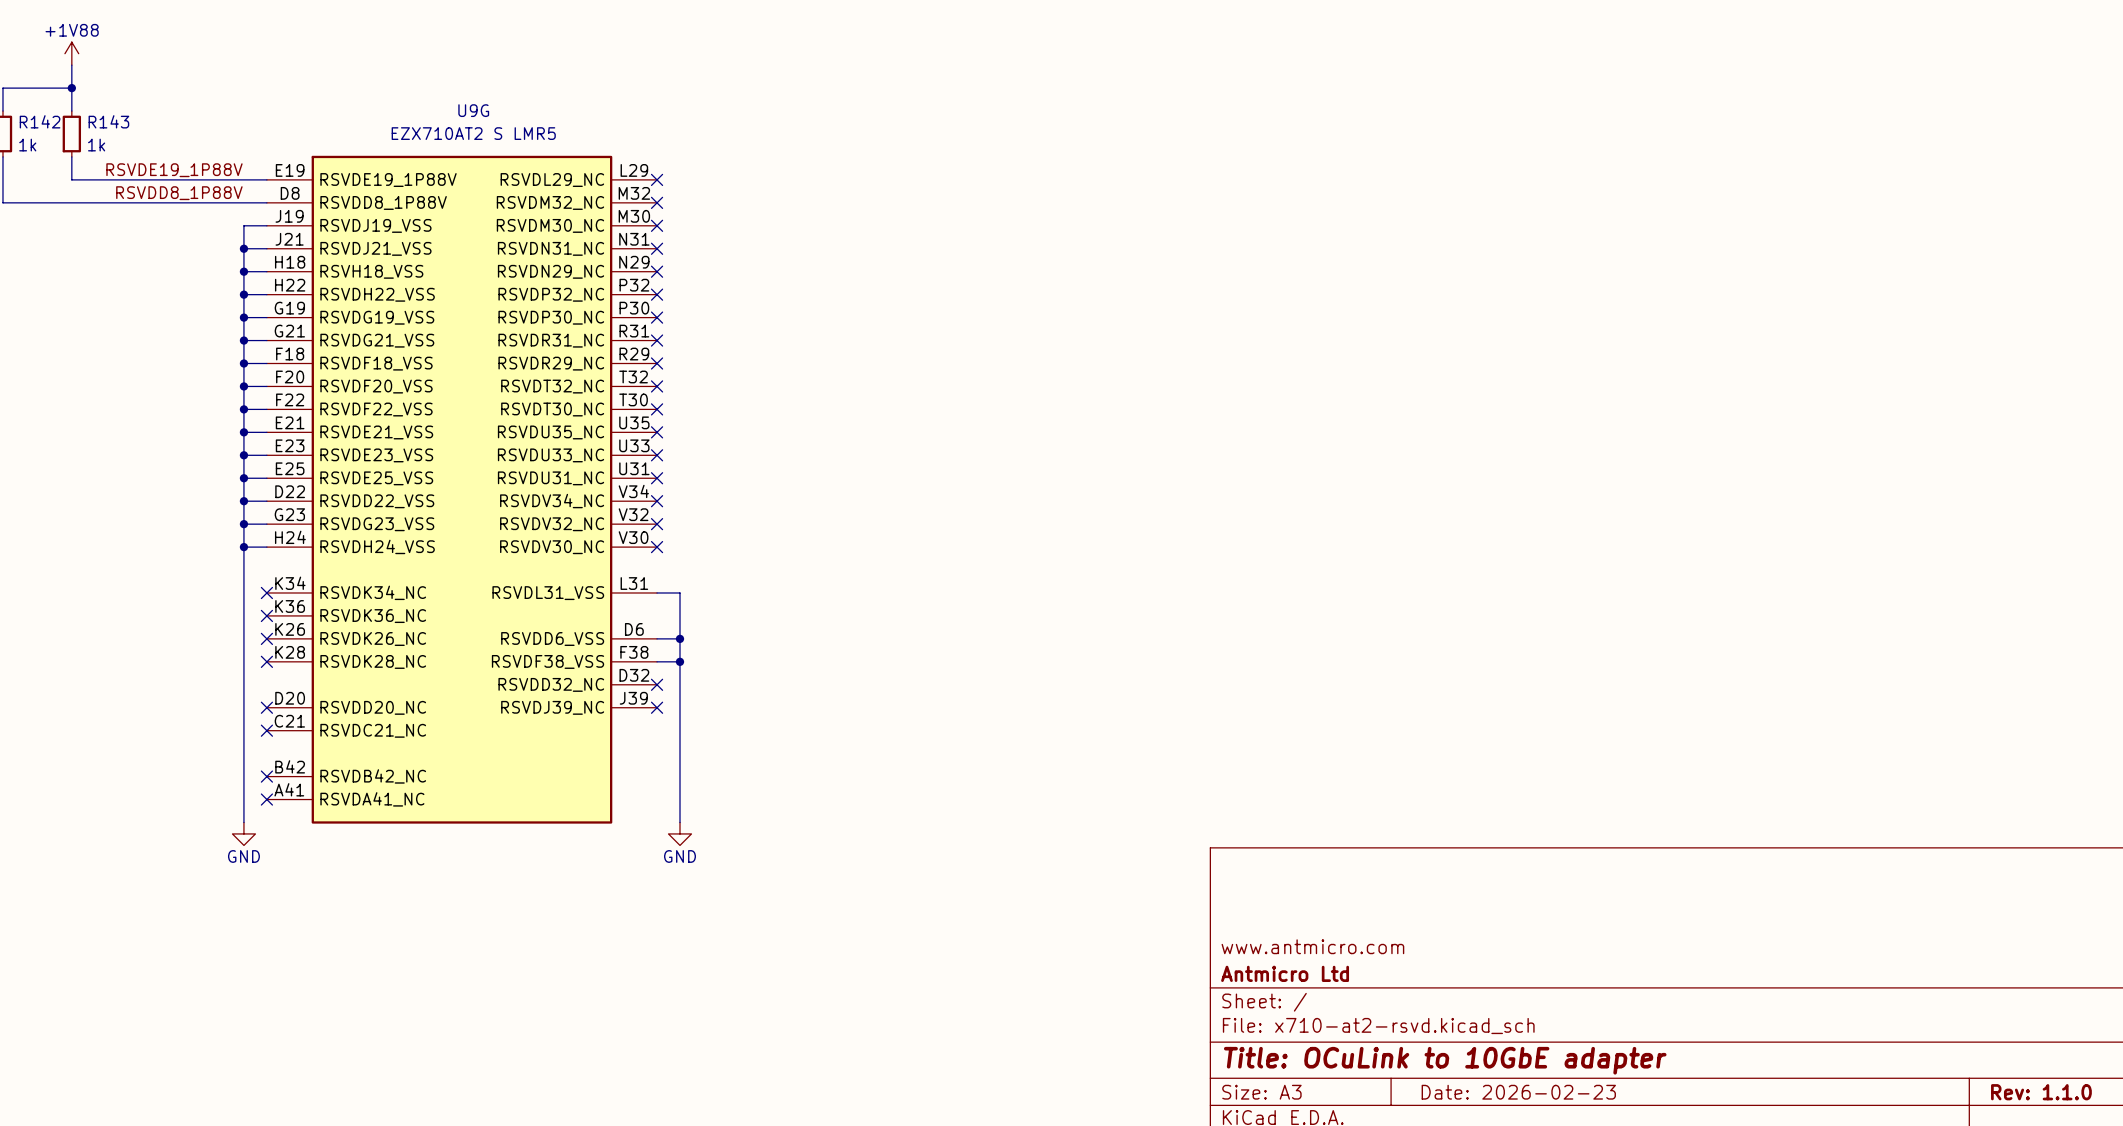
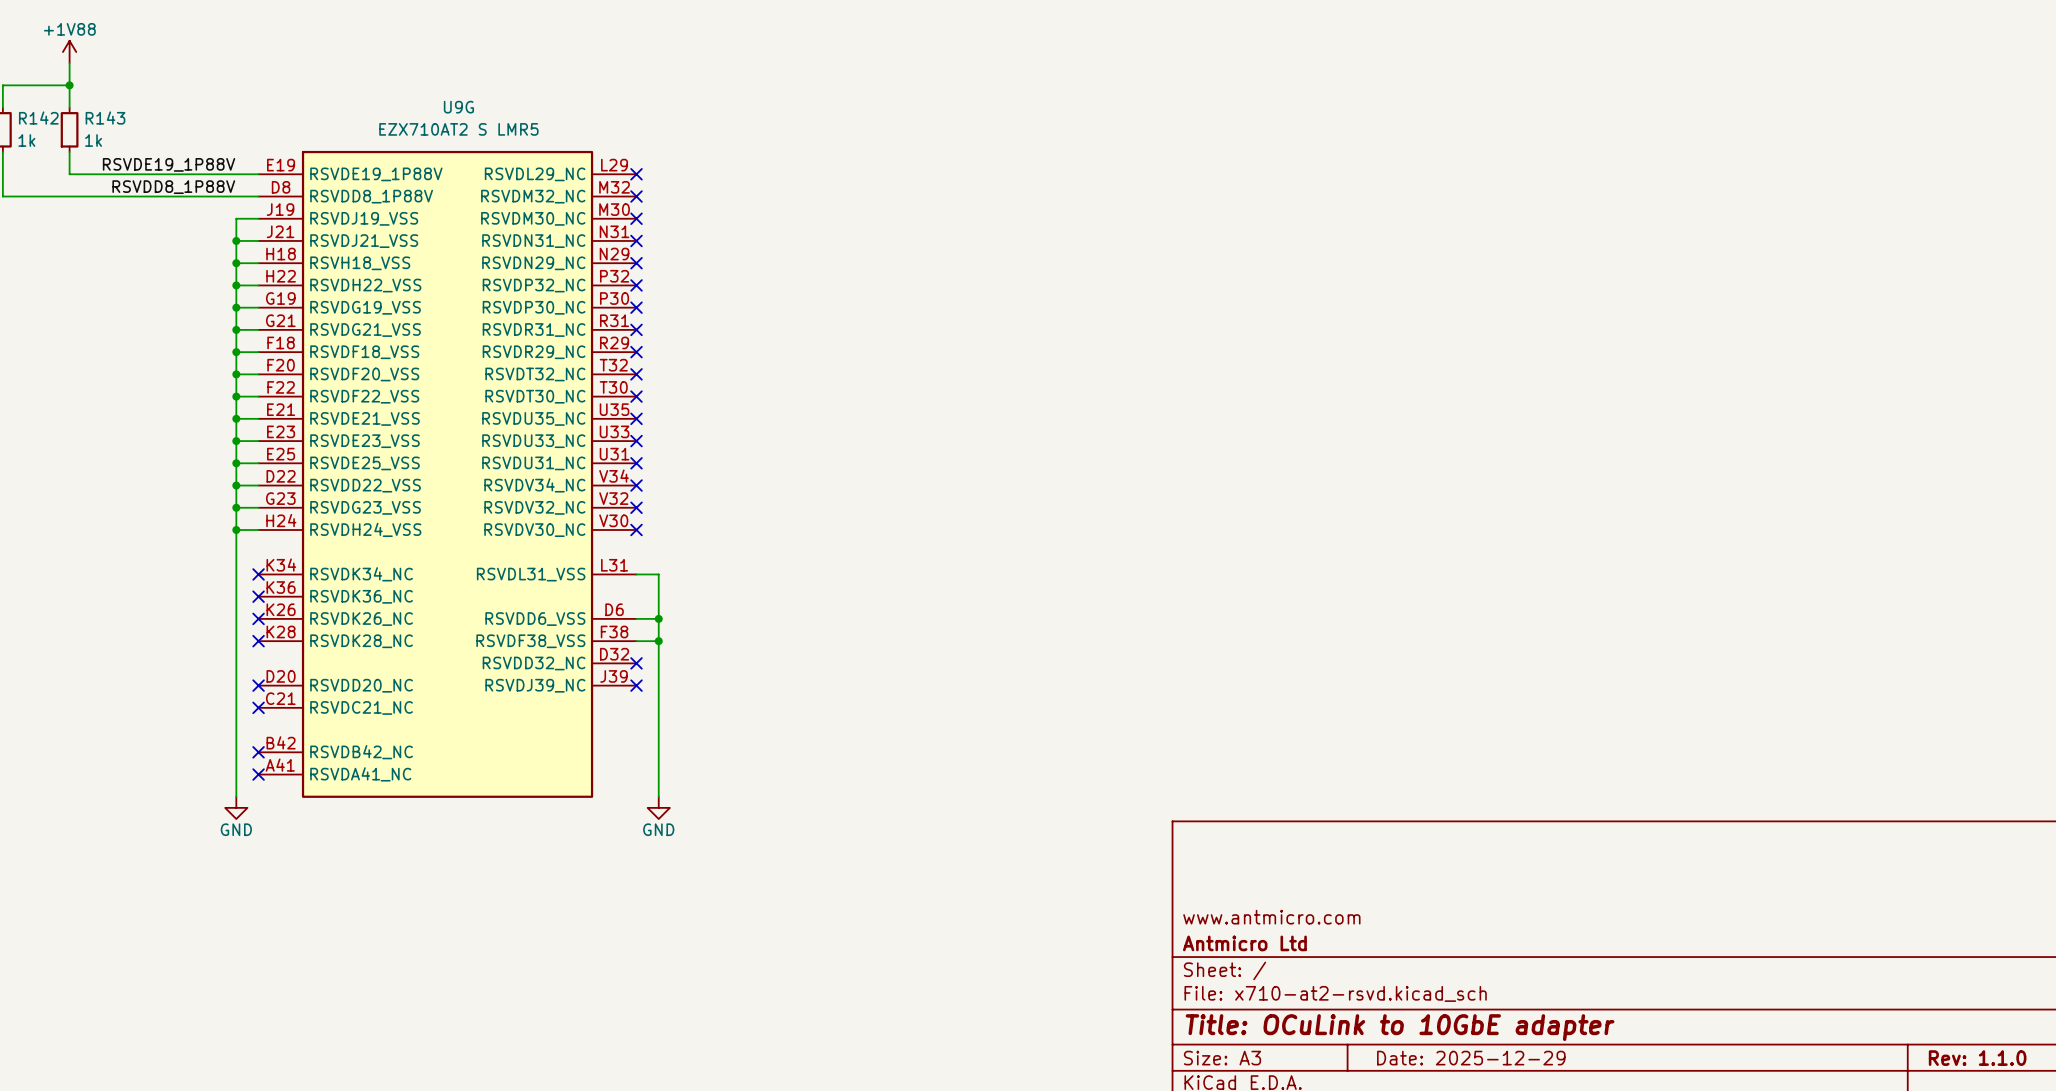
title block: Date: 2026-02-23 (1518, 1092) -> Date: 2025-12-29 (1471, 1058)

